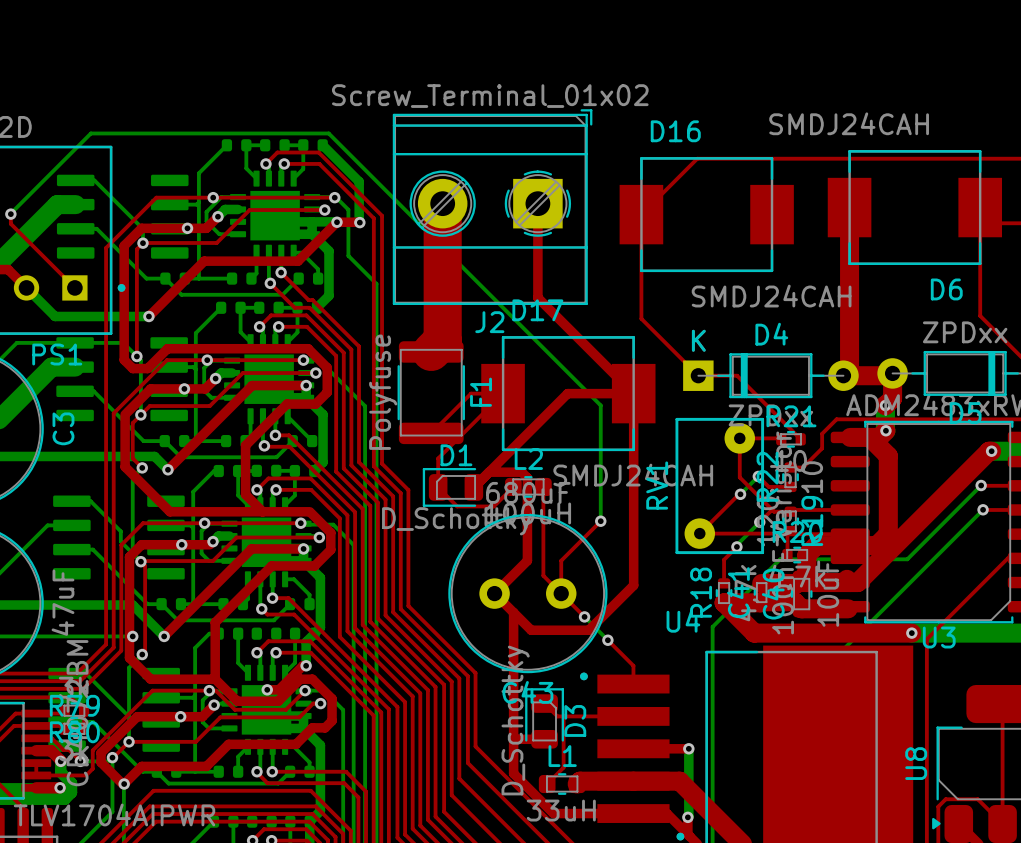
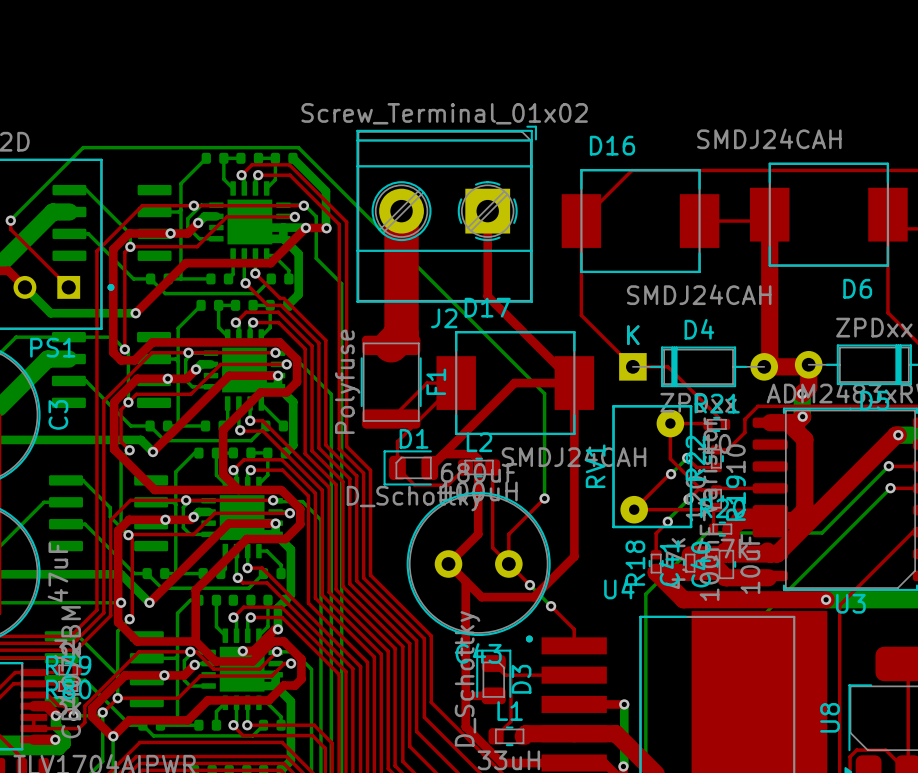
top track: none -> (769, 214) (763, 221) (699, 221)

